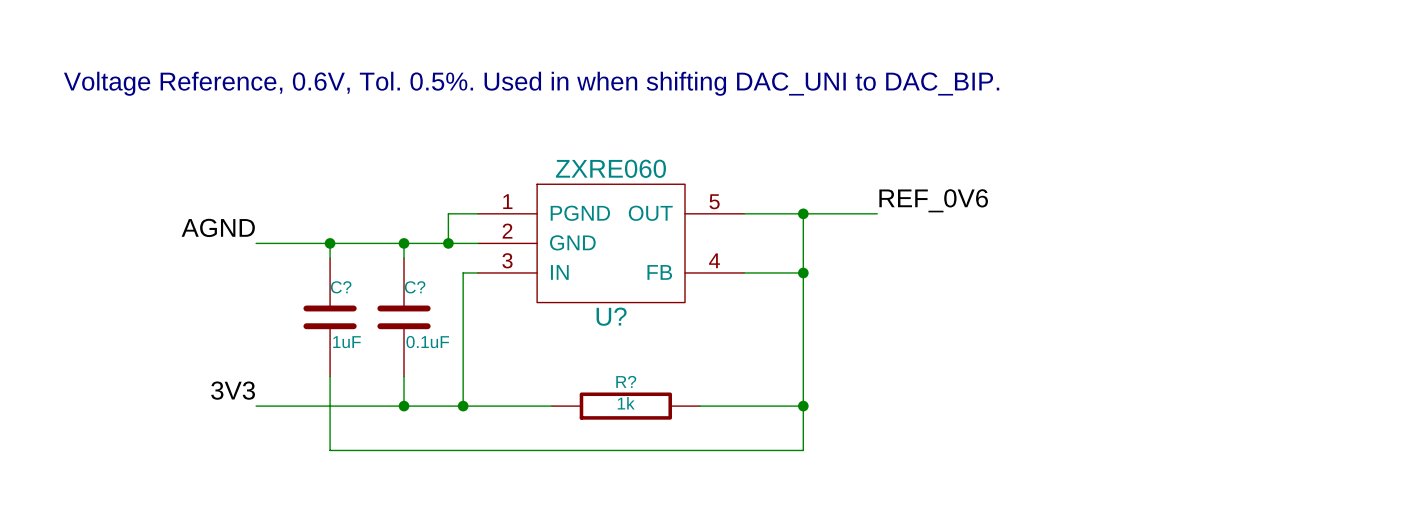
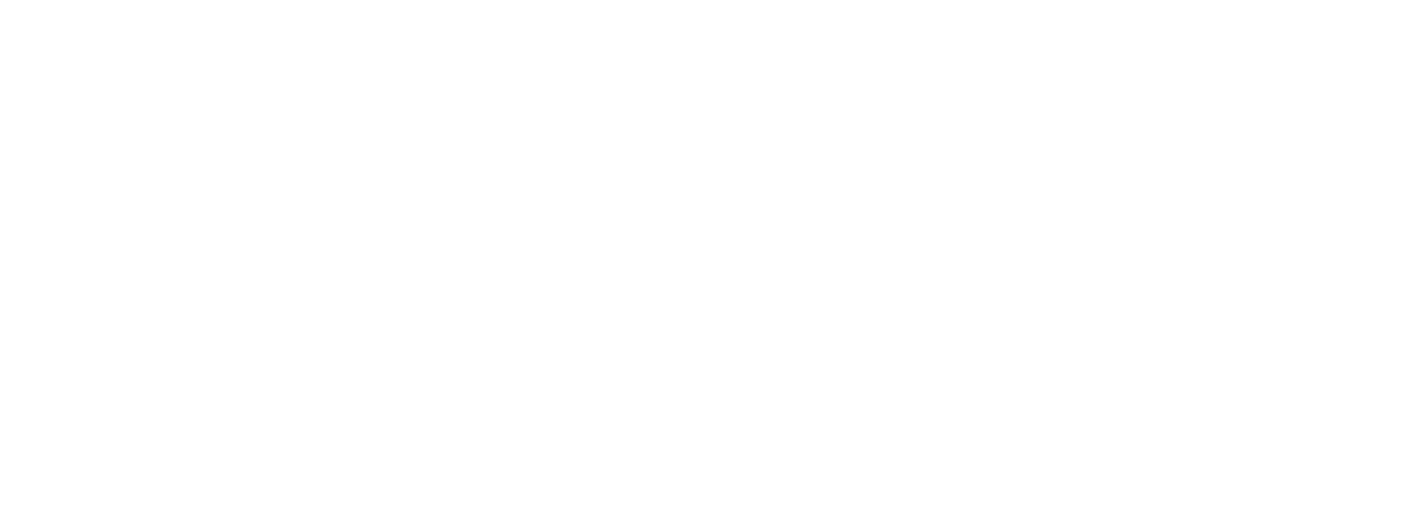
text: Voltage Reference, 0.6V, Tol. 0.5%. Used in when shifting DAC_UNI to DAC_BIP. (531, 83) -> none
label: REF_0V6 (933, 200) -> none
wire: (477, 213) (448, 213) (448, 243) -> none
wire: (744, 213) (877, 213) -> none
wire: (803, 213) (803, 450) (330, 450) (330, 376) -> none
junction: (803, 213) -> none
label: AGND (218, 227) -> none
wire: (256, 243) (477, 243) -> none
wire: (330, 243) (330, 258) -> none
junction: (330, 243) -> none
wire: (404, 243) (404, 258) -> none
junction: (404, 243) -> none
junction: (448, 243) -> none
U?: ZXRE060 (611, 243) -> none
wire: (477, 272) (463, 272) (463, 406) -> none
wire: (744, 272) (803, 272) -> none
junction: (803, 272) -> none
C?: 1uF (330, 317) -> none
C?: 0.1uF (404, 317) -> none
wire: (404, 376) (404, 406) -> none
label: 3V3 (233, 390) -> none
wire: (256, 406) (551, 406) -> none
junction: (404, 406) -> none
junction: (463, 406) -> none
R?: 1k (625, 406) -> none
wire: (699, 406) (803, 406) -> none
junction: (803, 406) -> none

